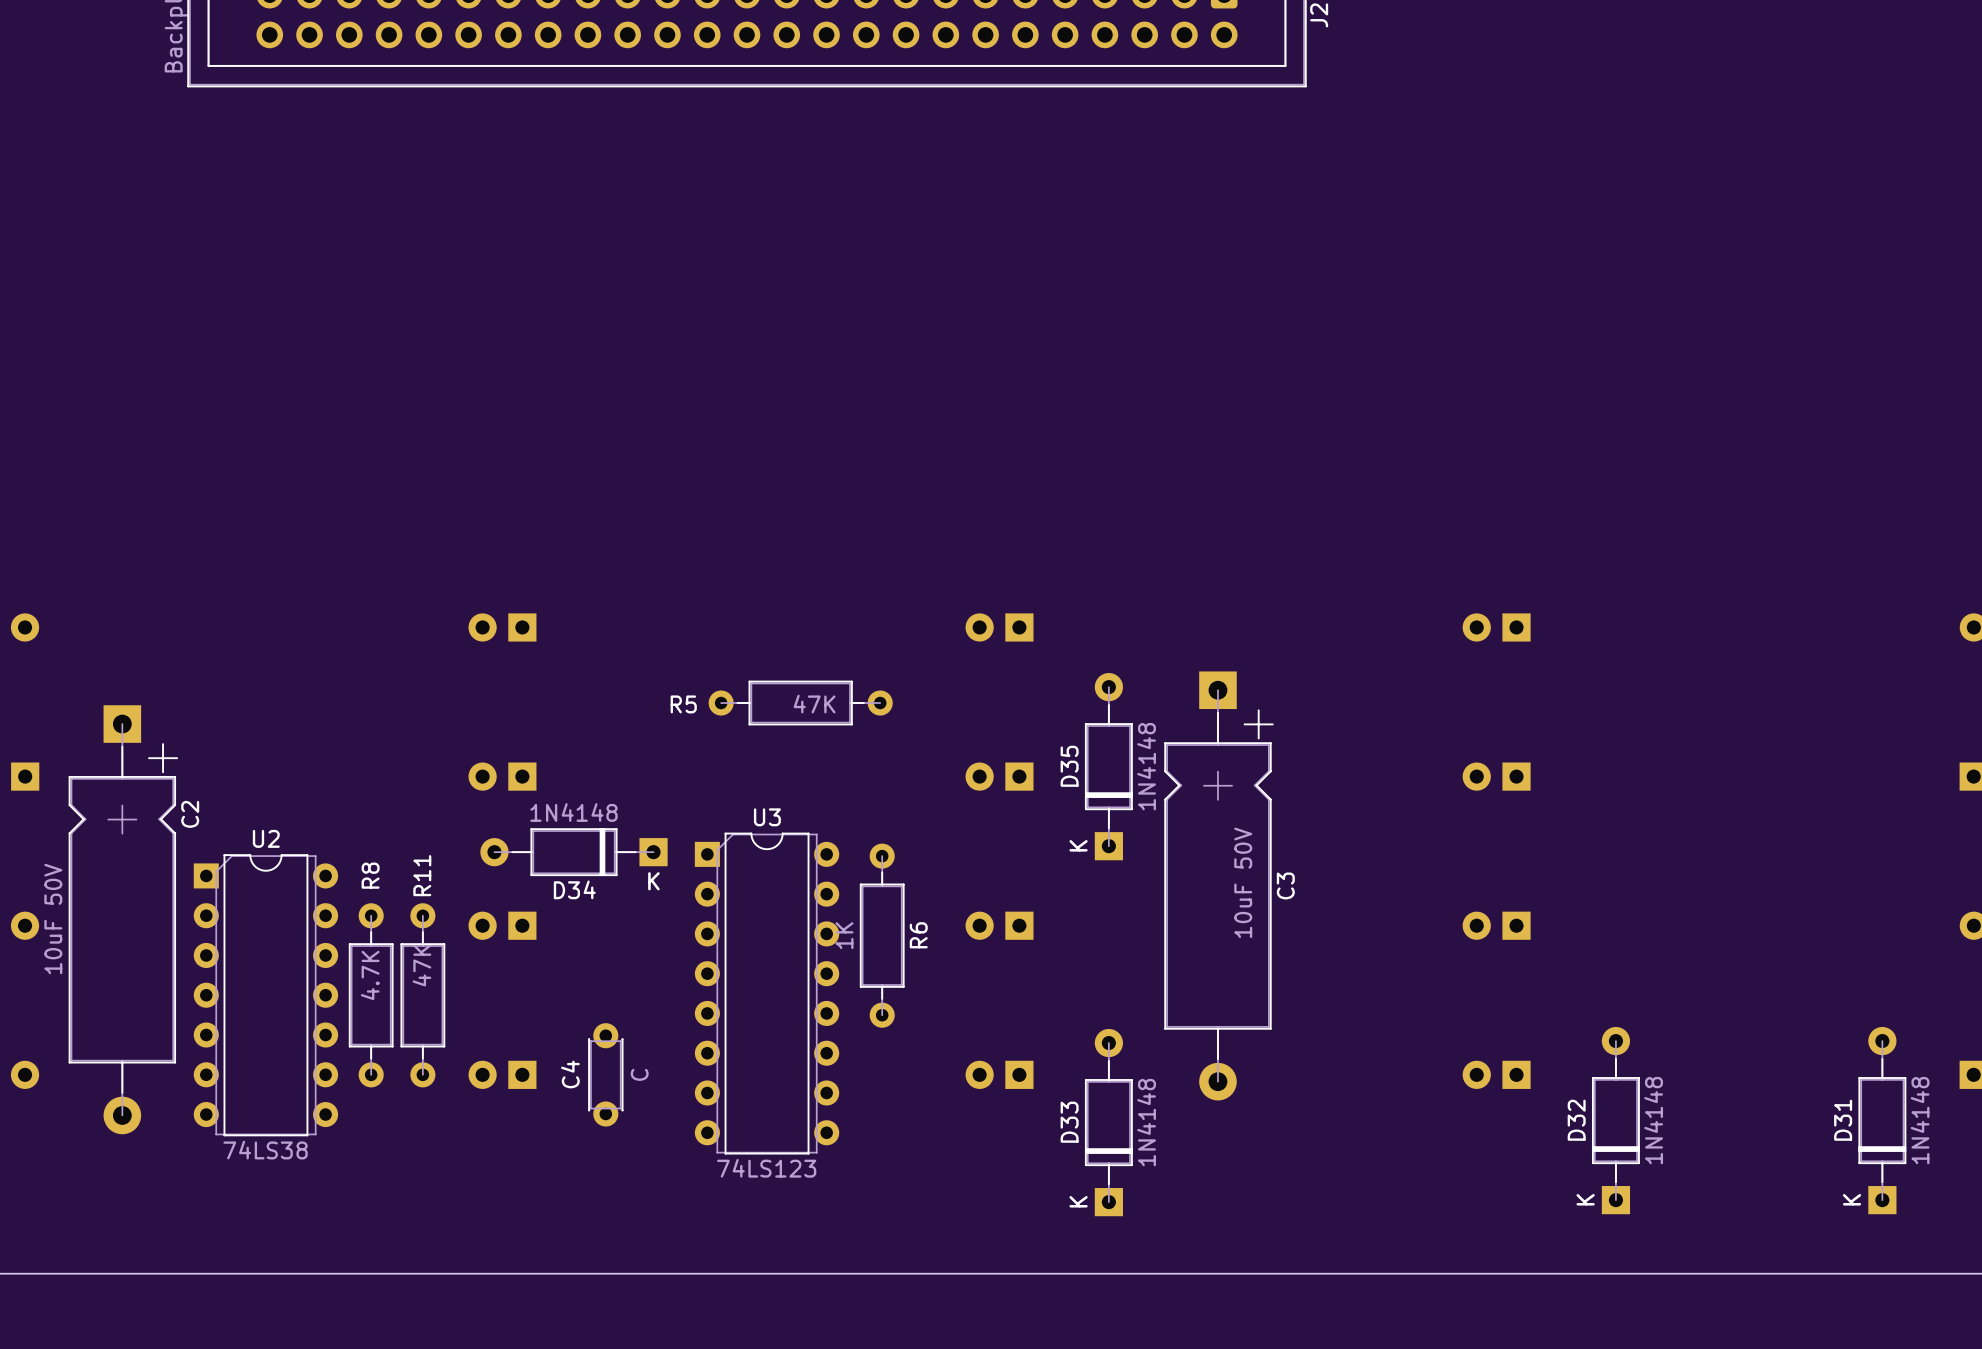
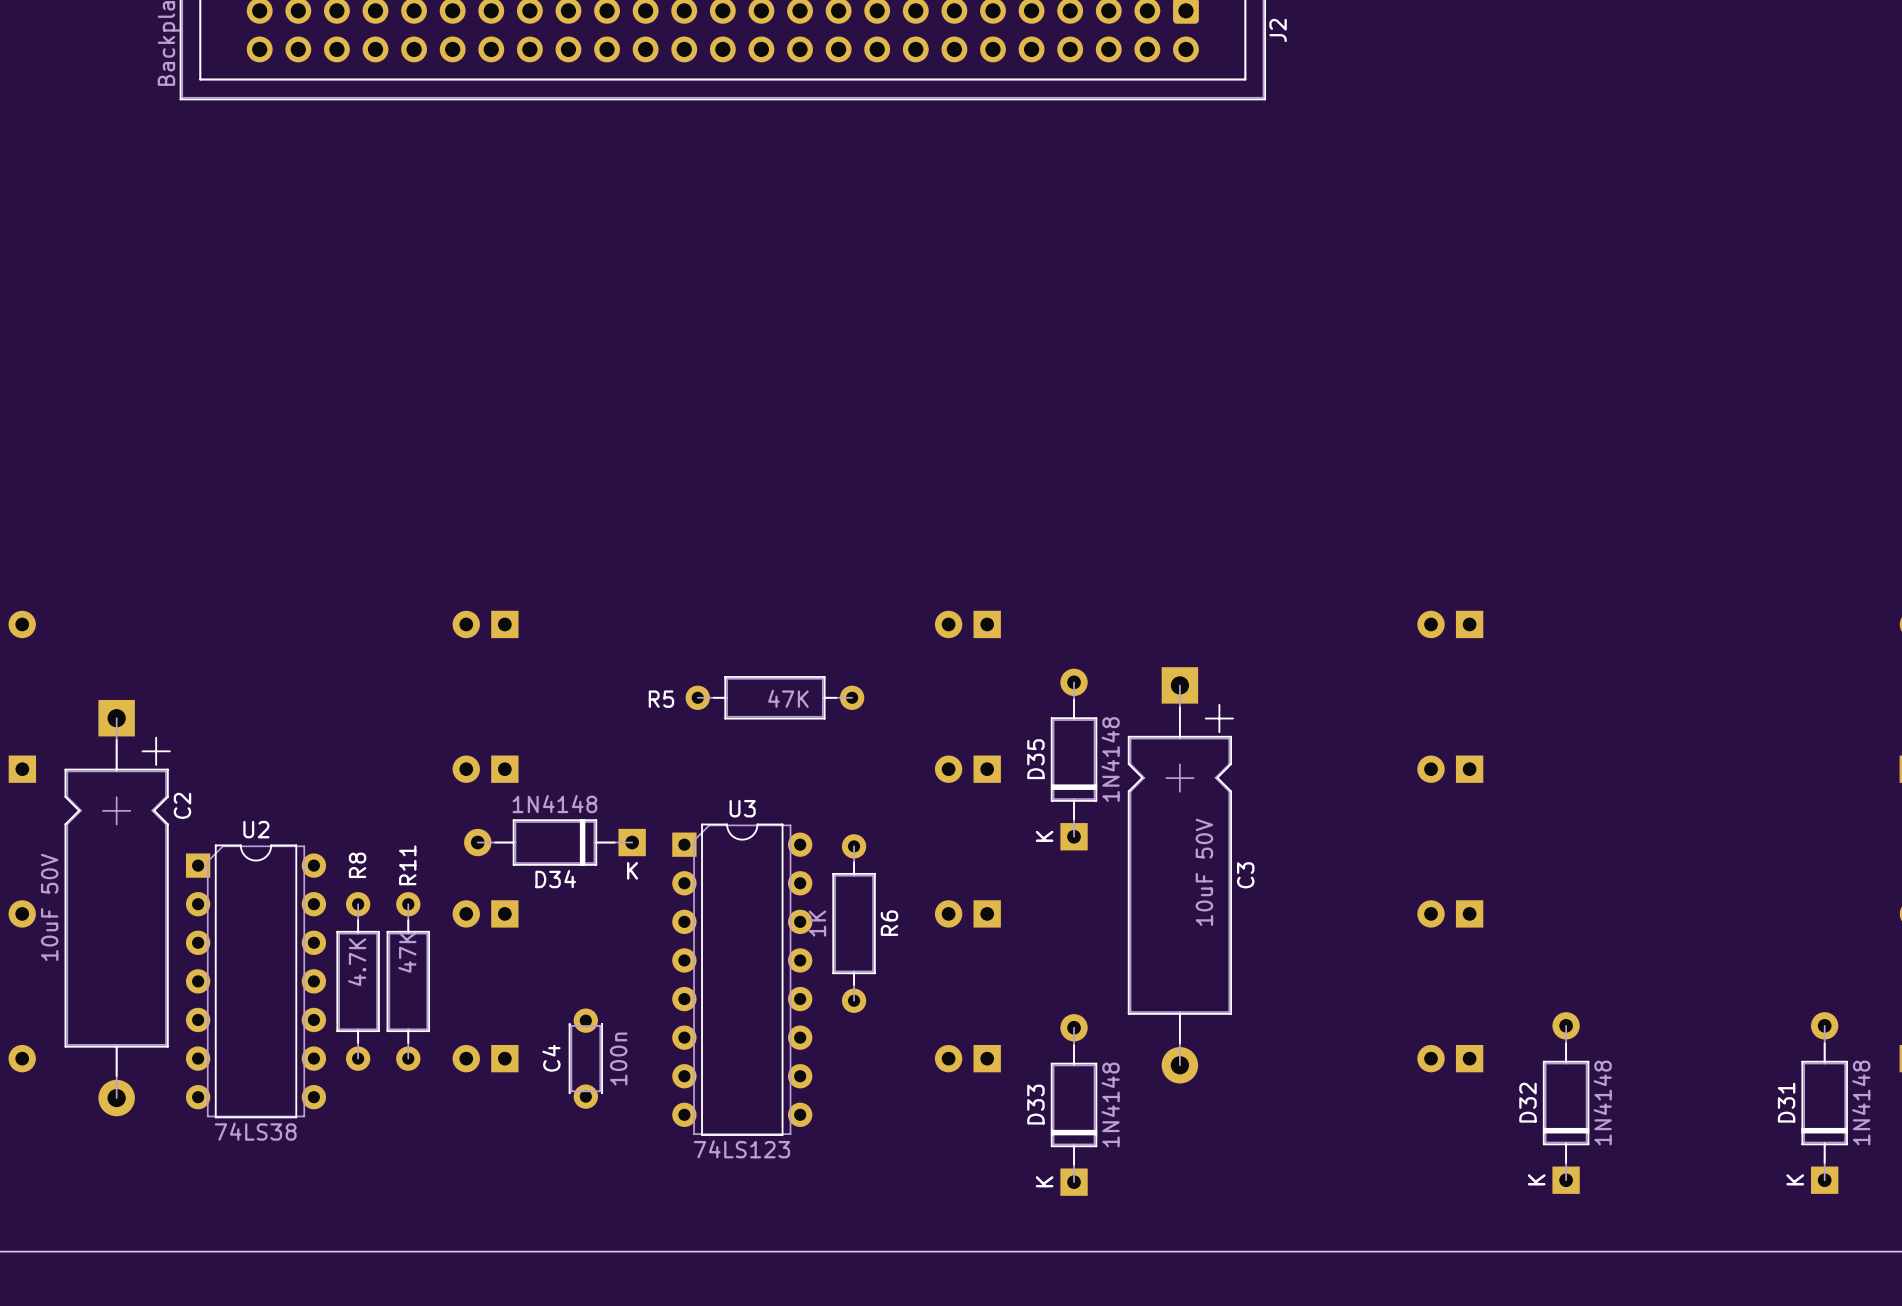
C4 value: C (639, 1074) -> 100n (618, 1059)

